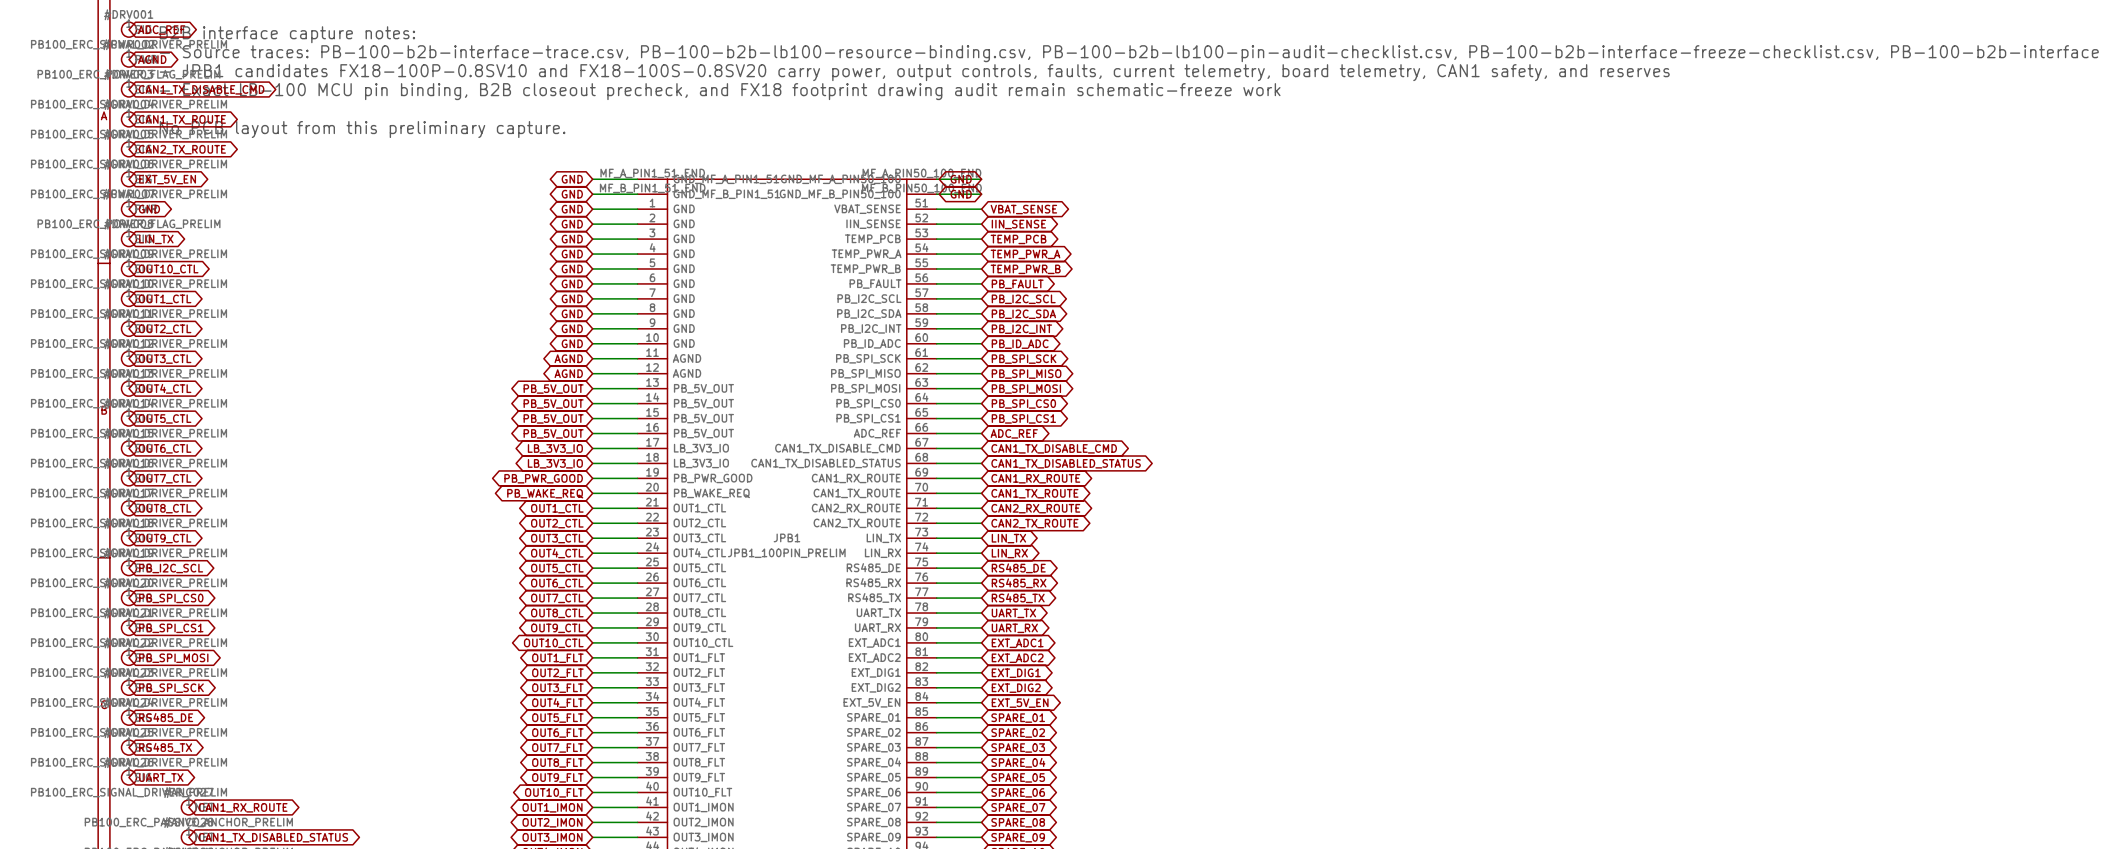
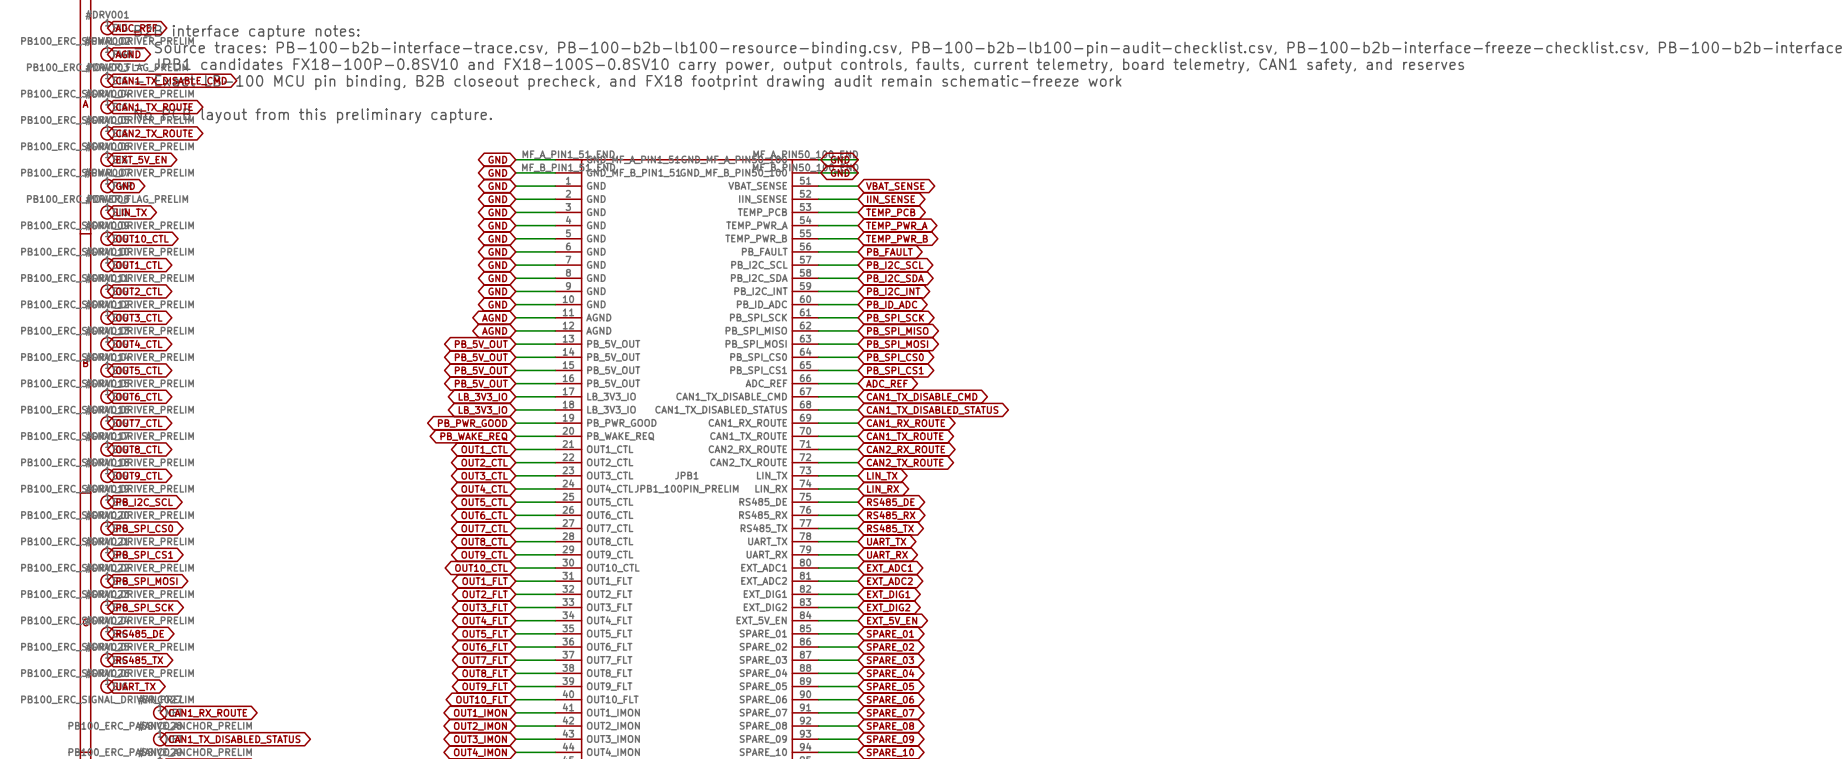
text: - JPB1 candidates FX18-100P-0.8SV10 and FX18-100S-0.8SV20 carry power, output controls, faults, current telemetry, board telemetry, CAN1 safety, and reserves (914, 72) -> - JPB1 candidates FX18-100P-0.8SV10 and FX18-100S-0.8SV10 carry power, output controls, faults, current telemetry, board telemetry, CAN1 safety, and reserves (799, 65)

